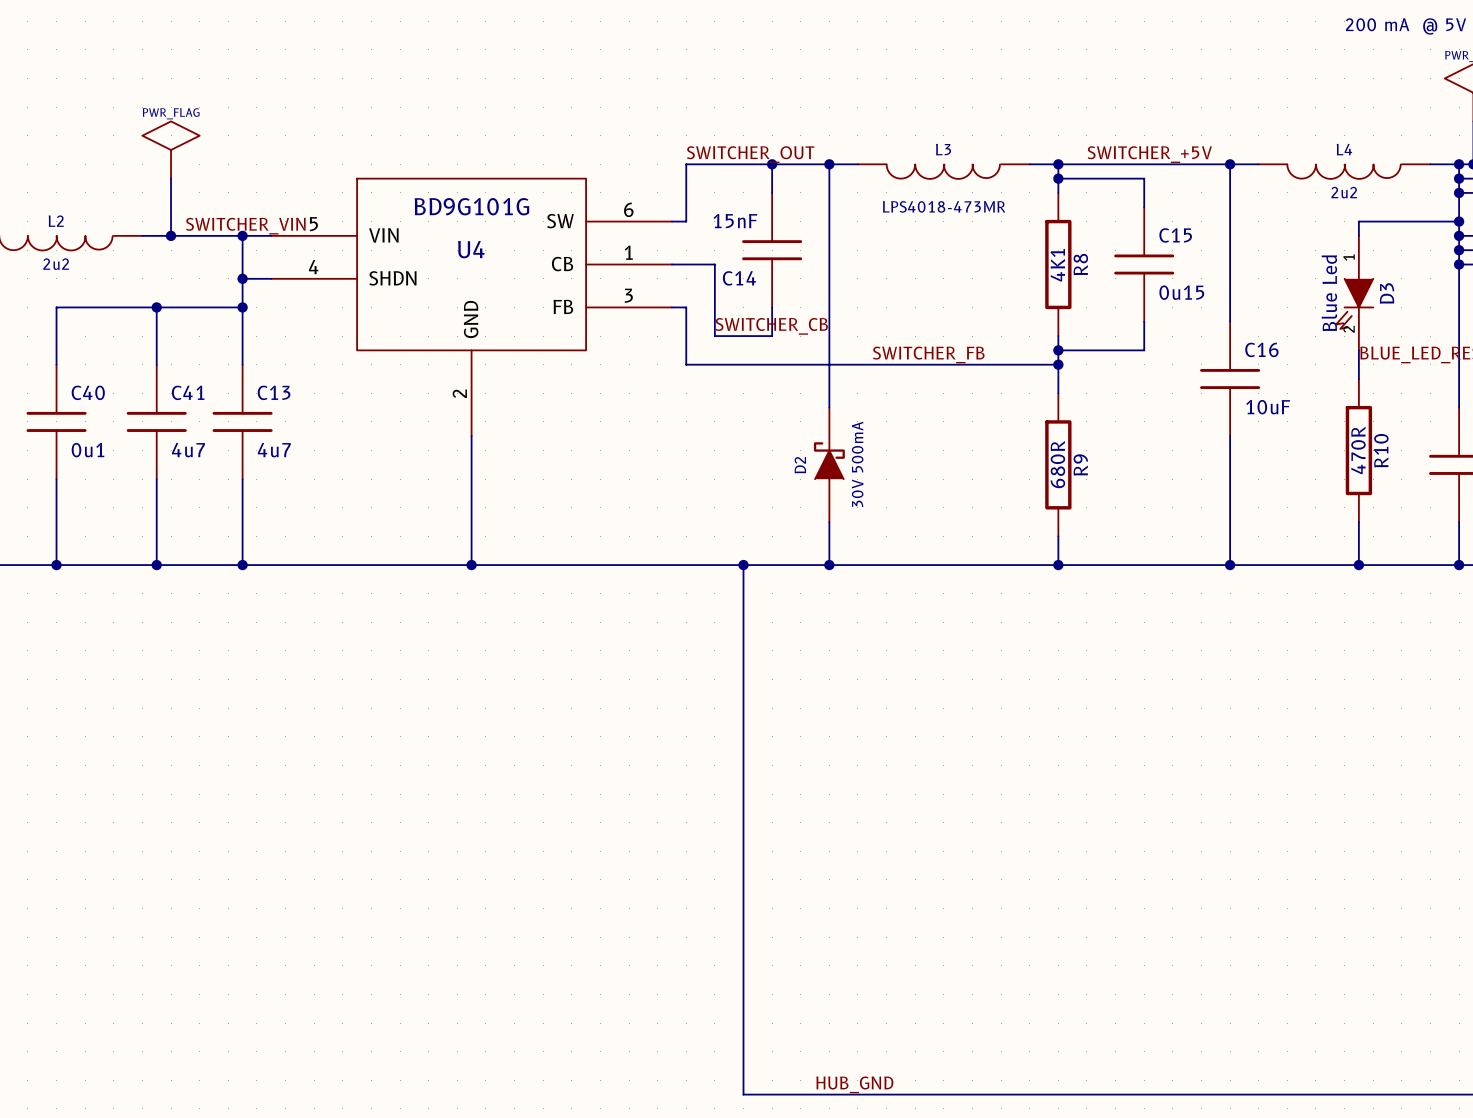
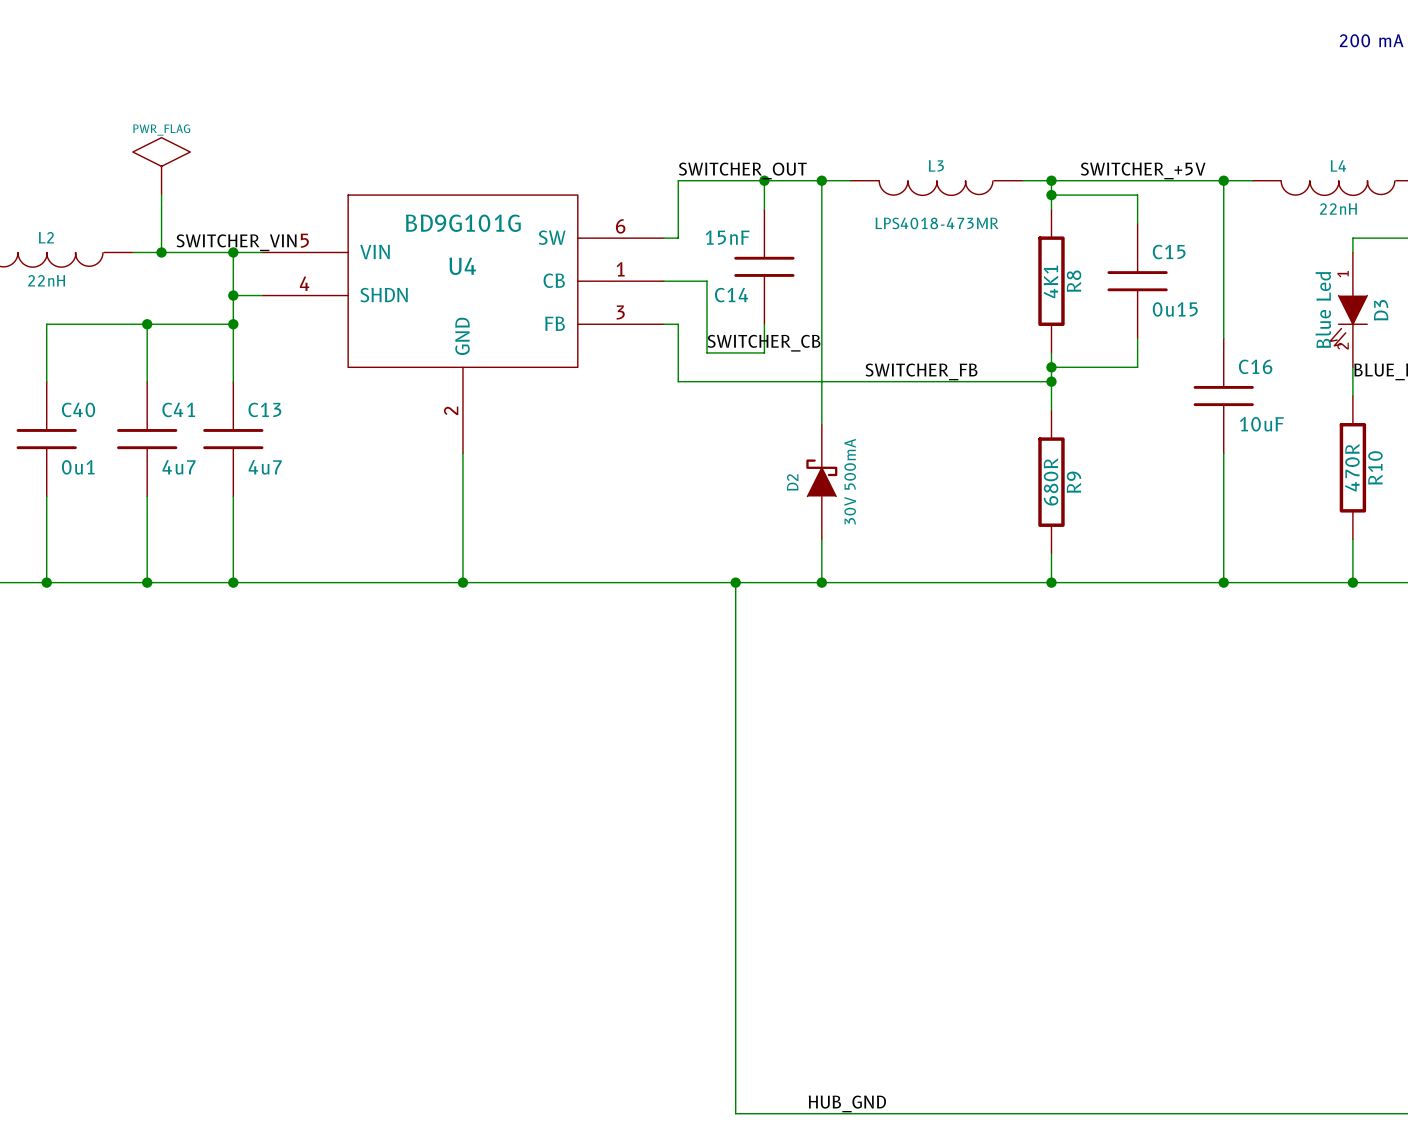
L4 value: 2u2 (1344, 192) -> 22nH (1338, 209)
L2 value: 2u2 (56, 264) -> 22nH (46, 280)

